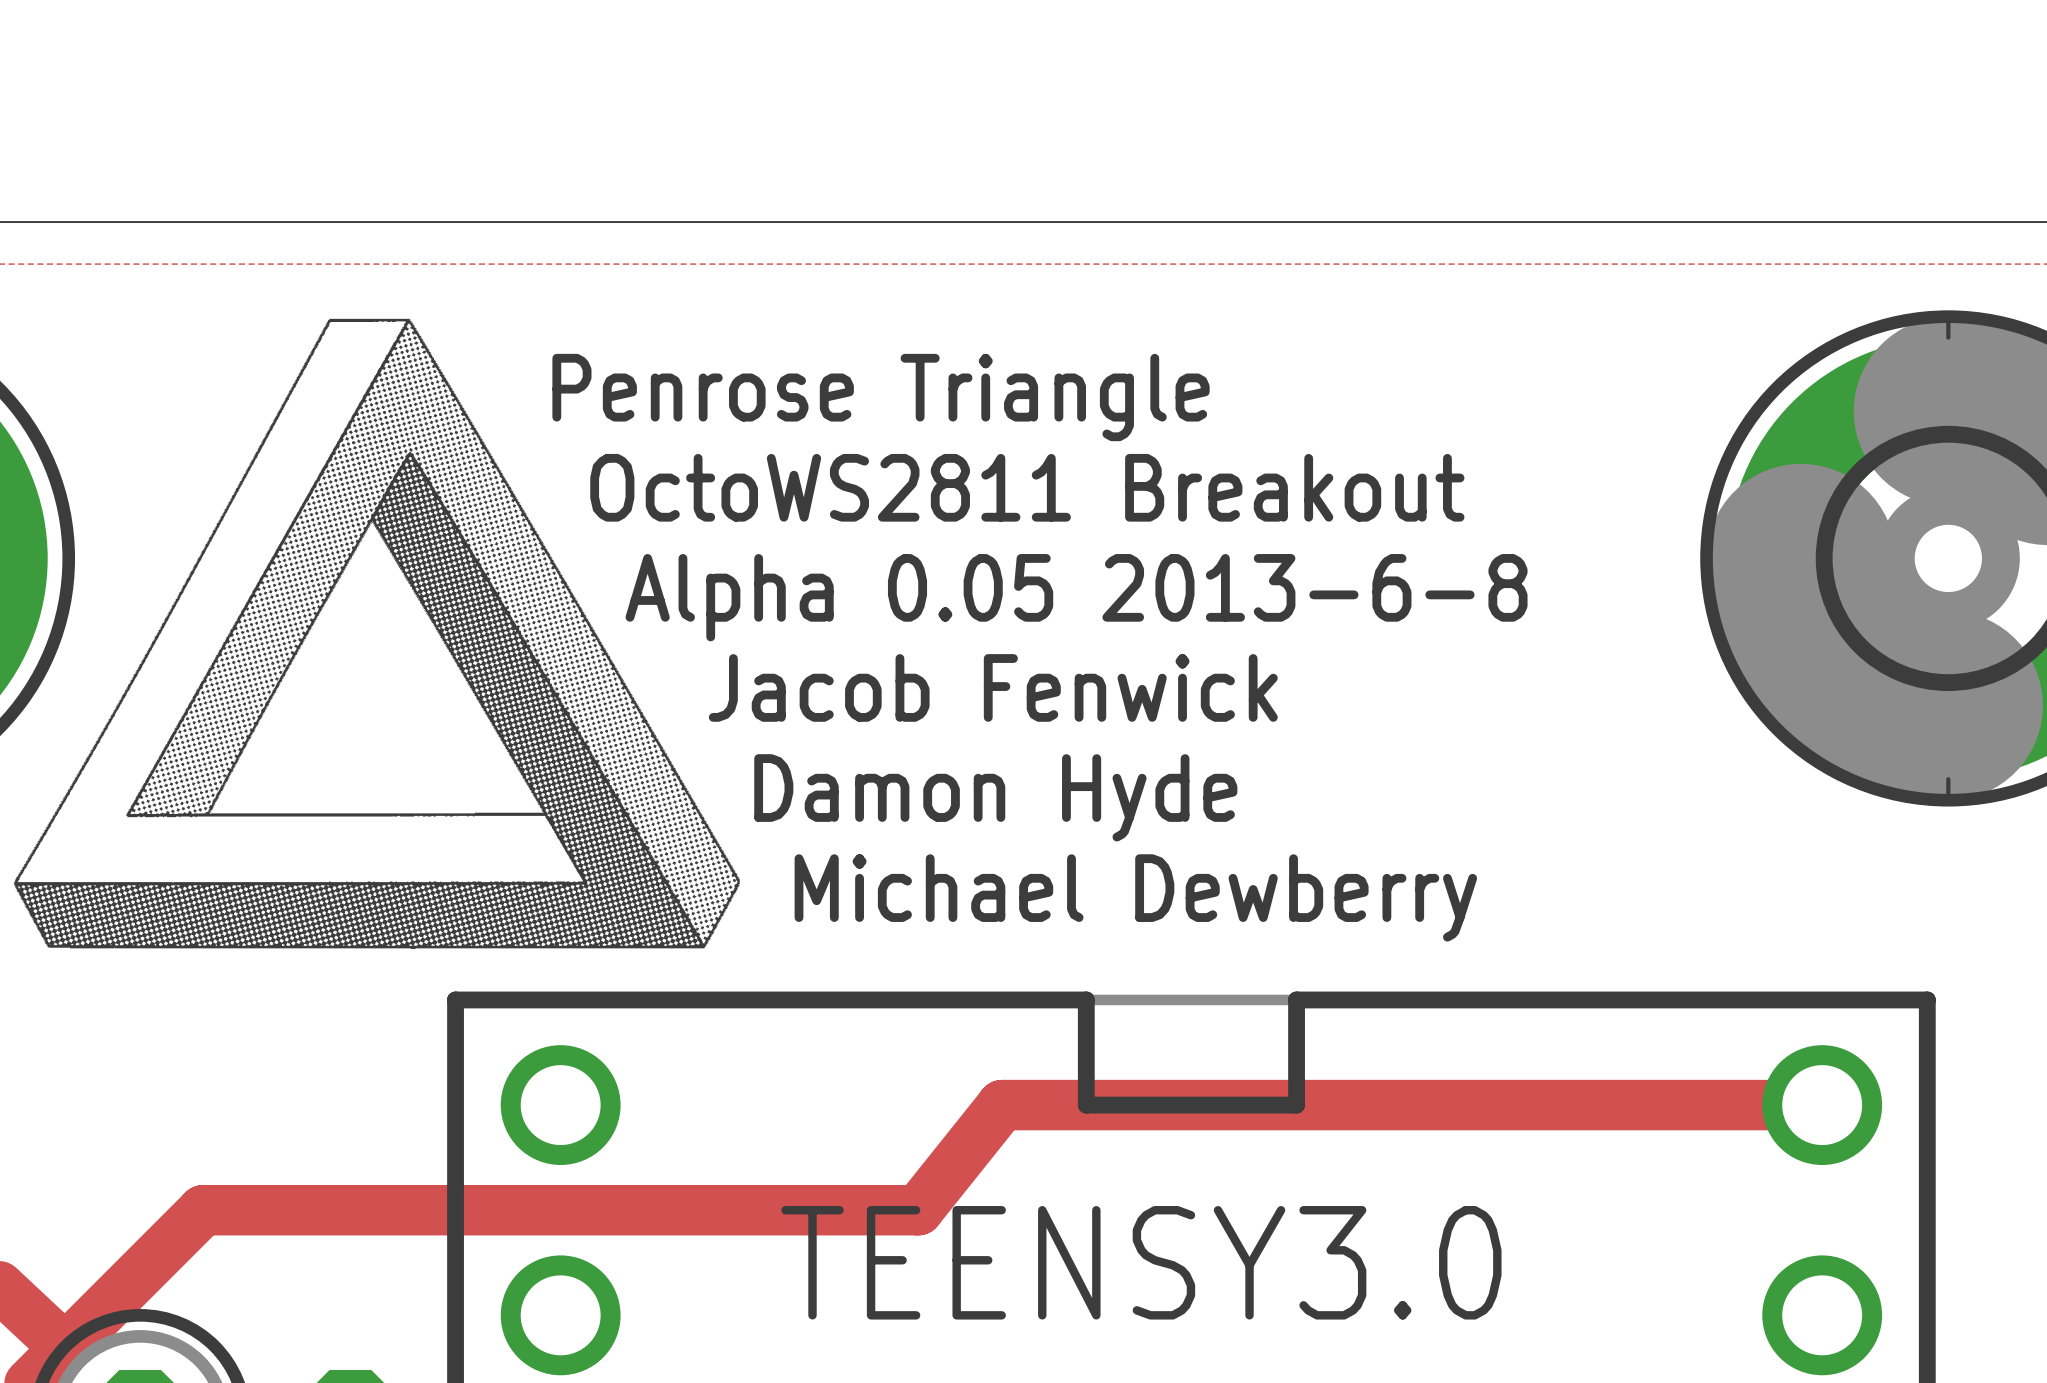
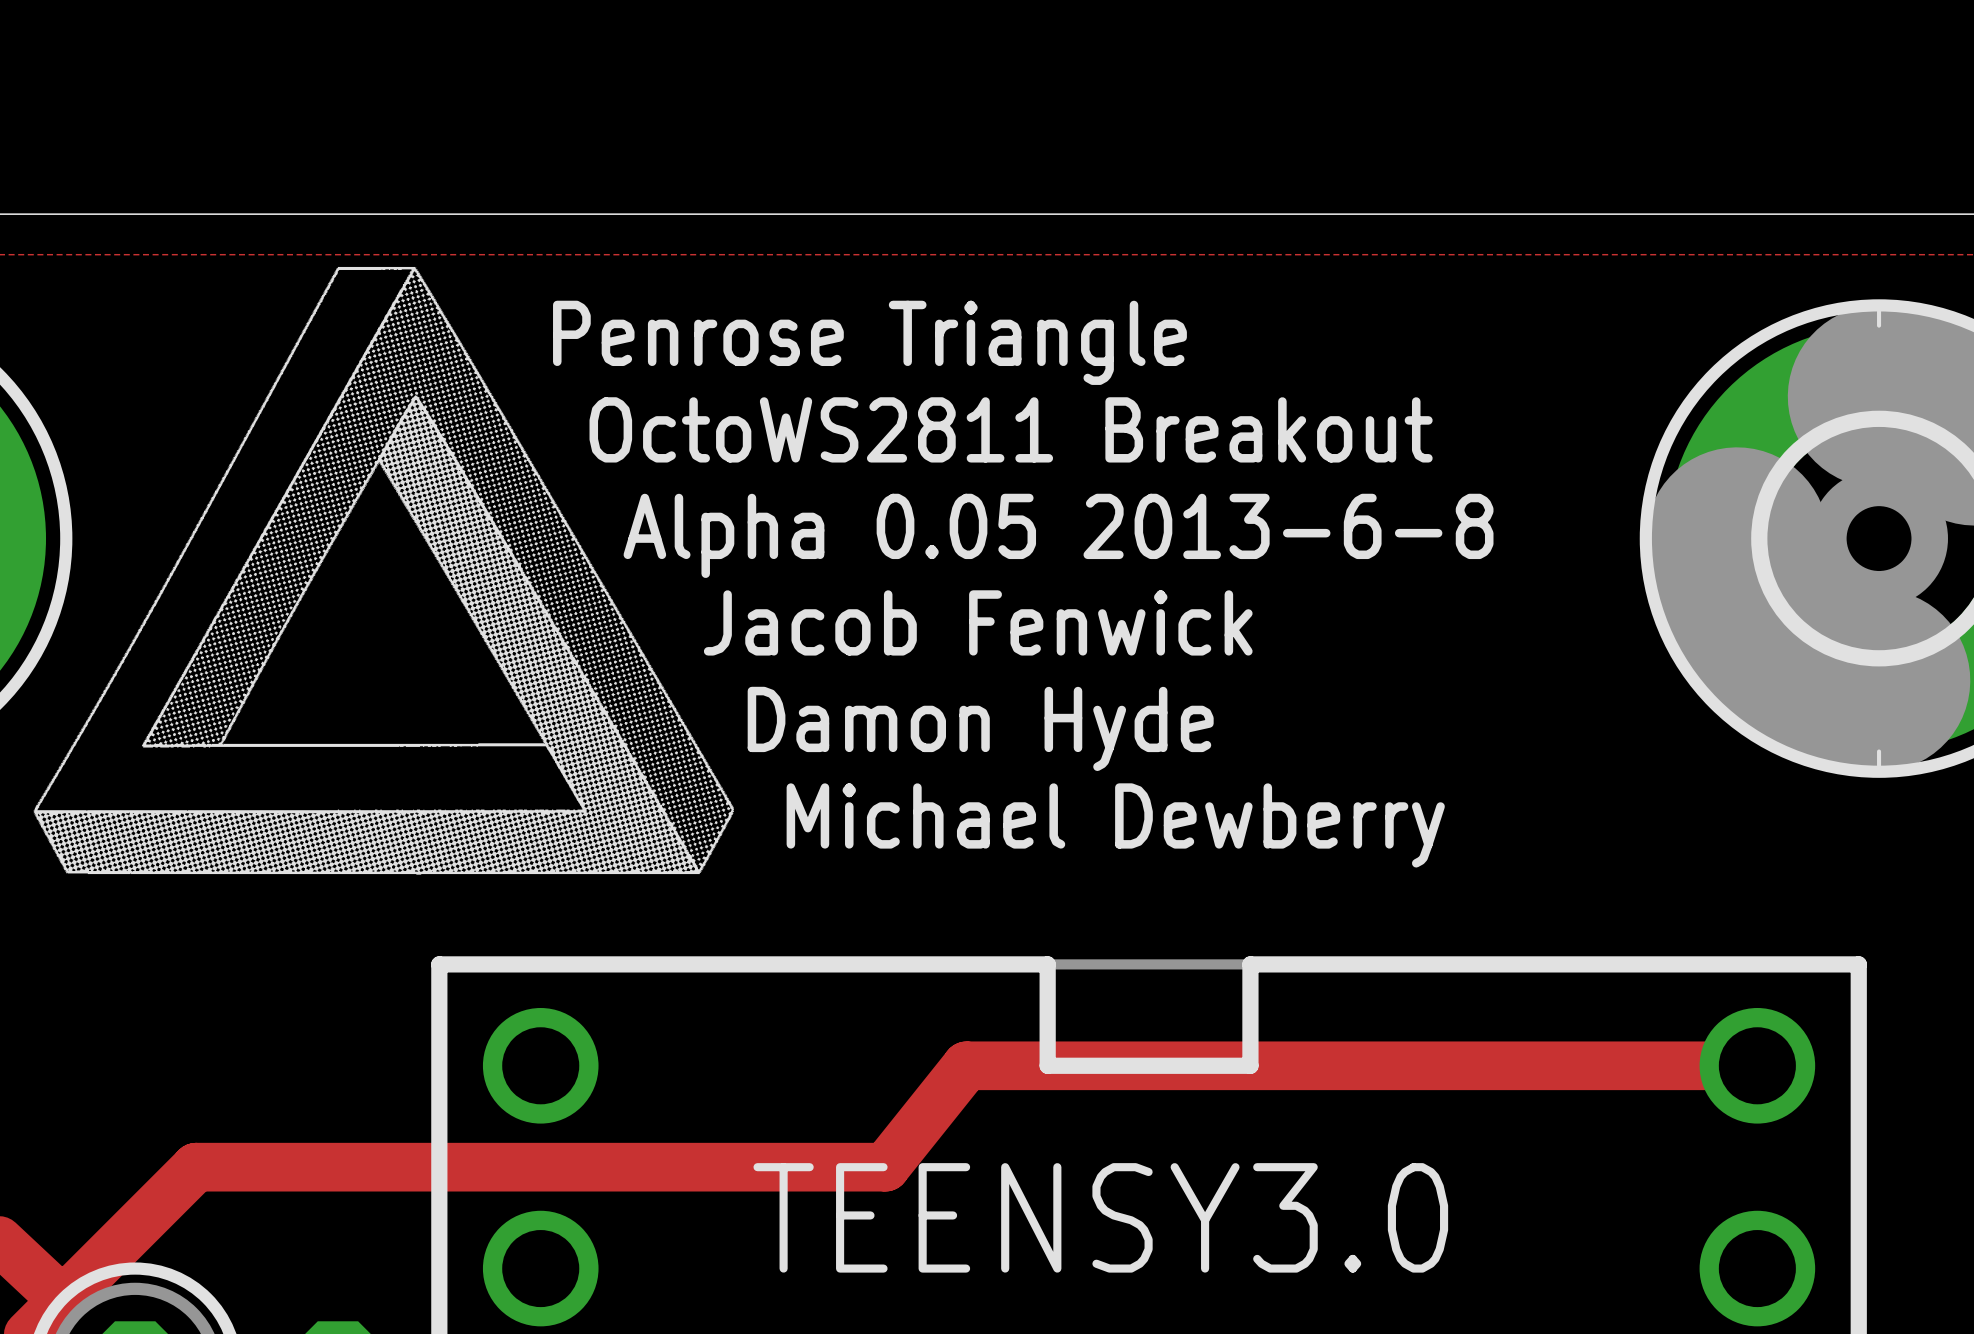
text position: Penrose Triangle (881, 397) -> Penrose Triangle (869, 342)
text position: OctoWS2811 Breakout (1027, 487) -> OctoWS2811 Breakout (1011, 429)
text position: Alpha 0.05 2013-6-8 (1076, 597) -> Alpha 0.05 2013-6-8 (1058, 535)
drawing position: (376, 633) -> (383, 570)
text position: Jacob Fenwick (993, 687) -> Jacob Fenwick (978, 622)
text position: Damon Hyde (995, 797) -> Damon Hyde (980, 728)
text position: Michael Dewberry (1135, 897) -> Michael Dewberry (1115, 825)

